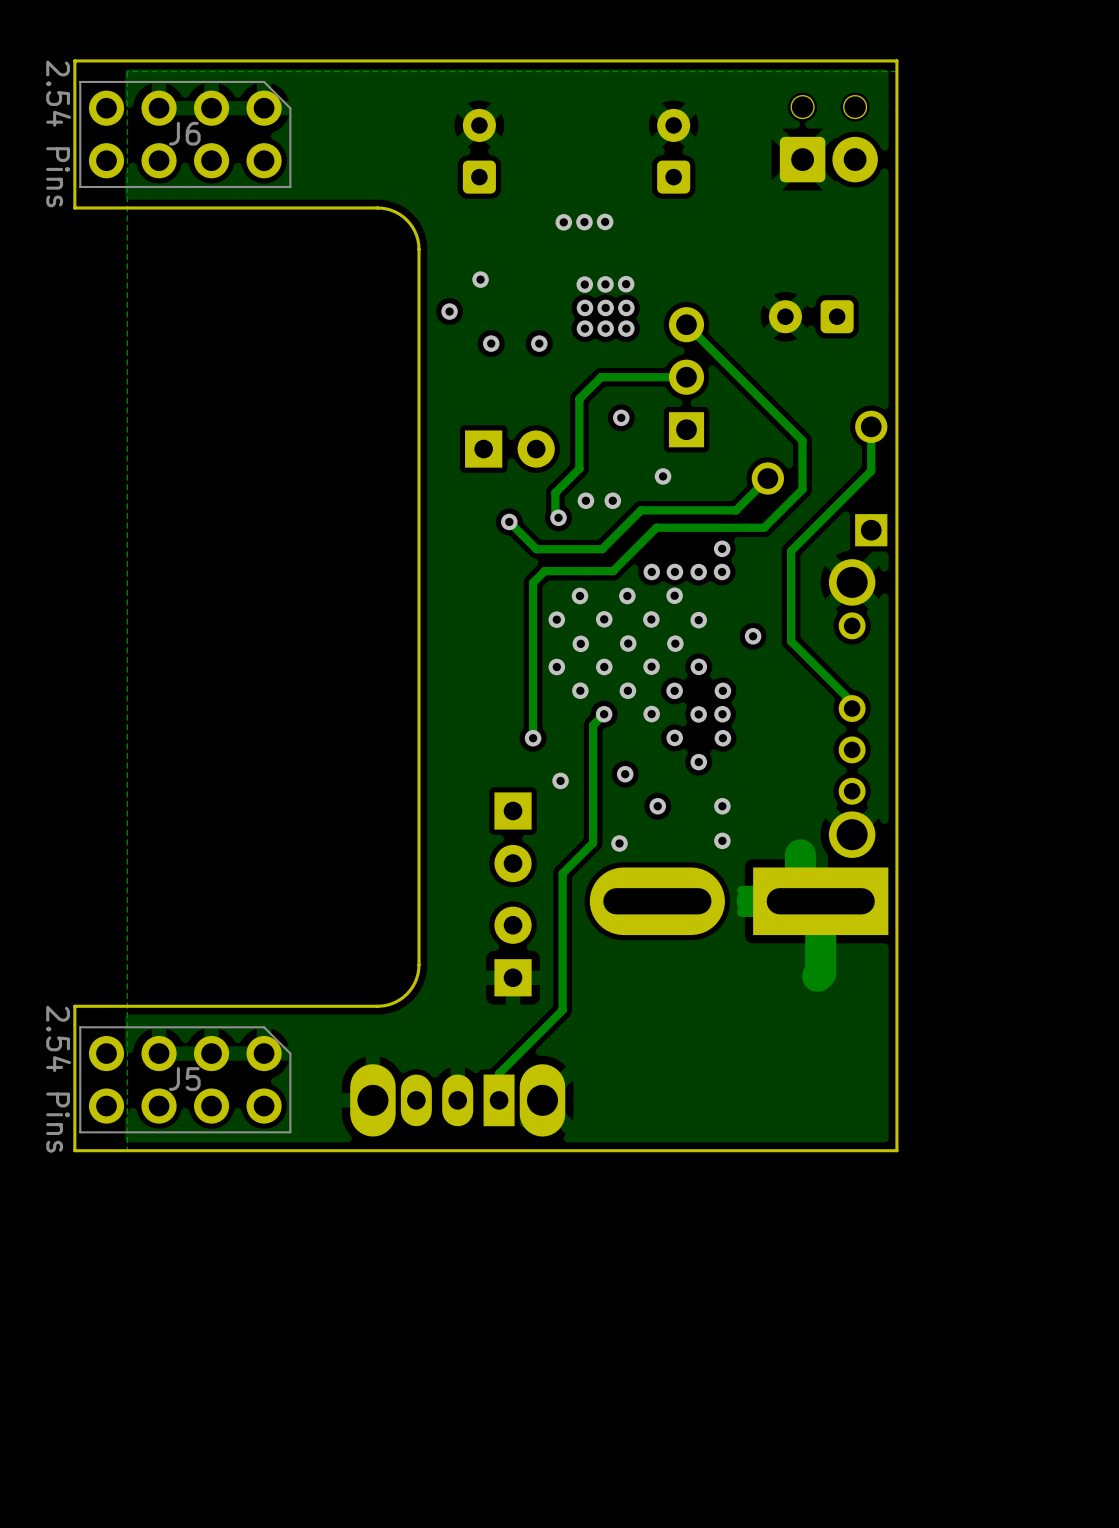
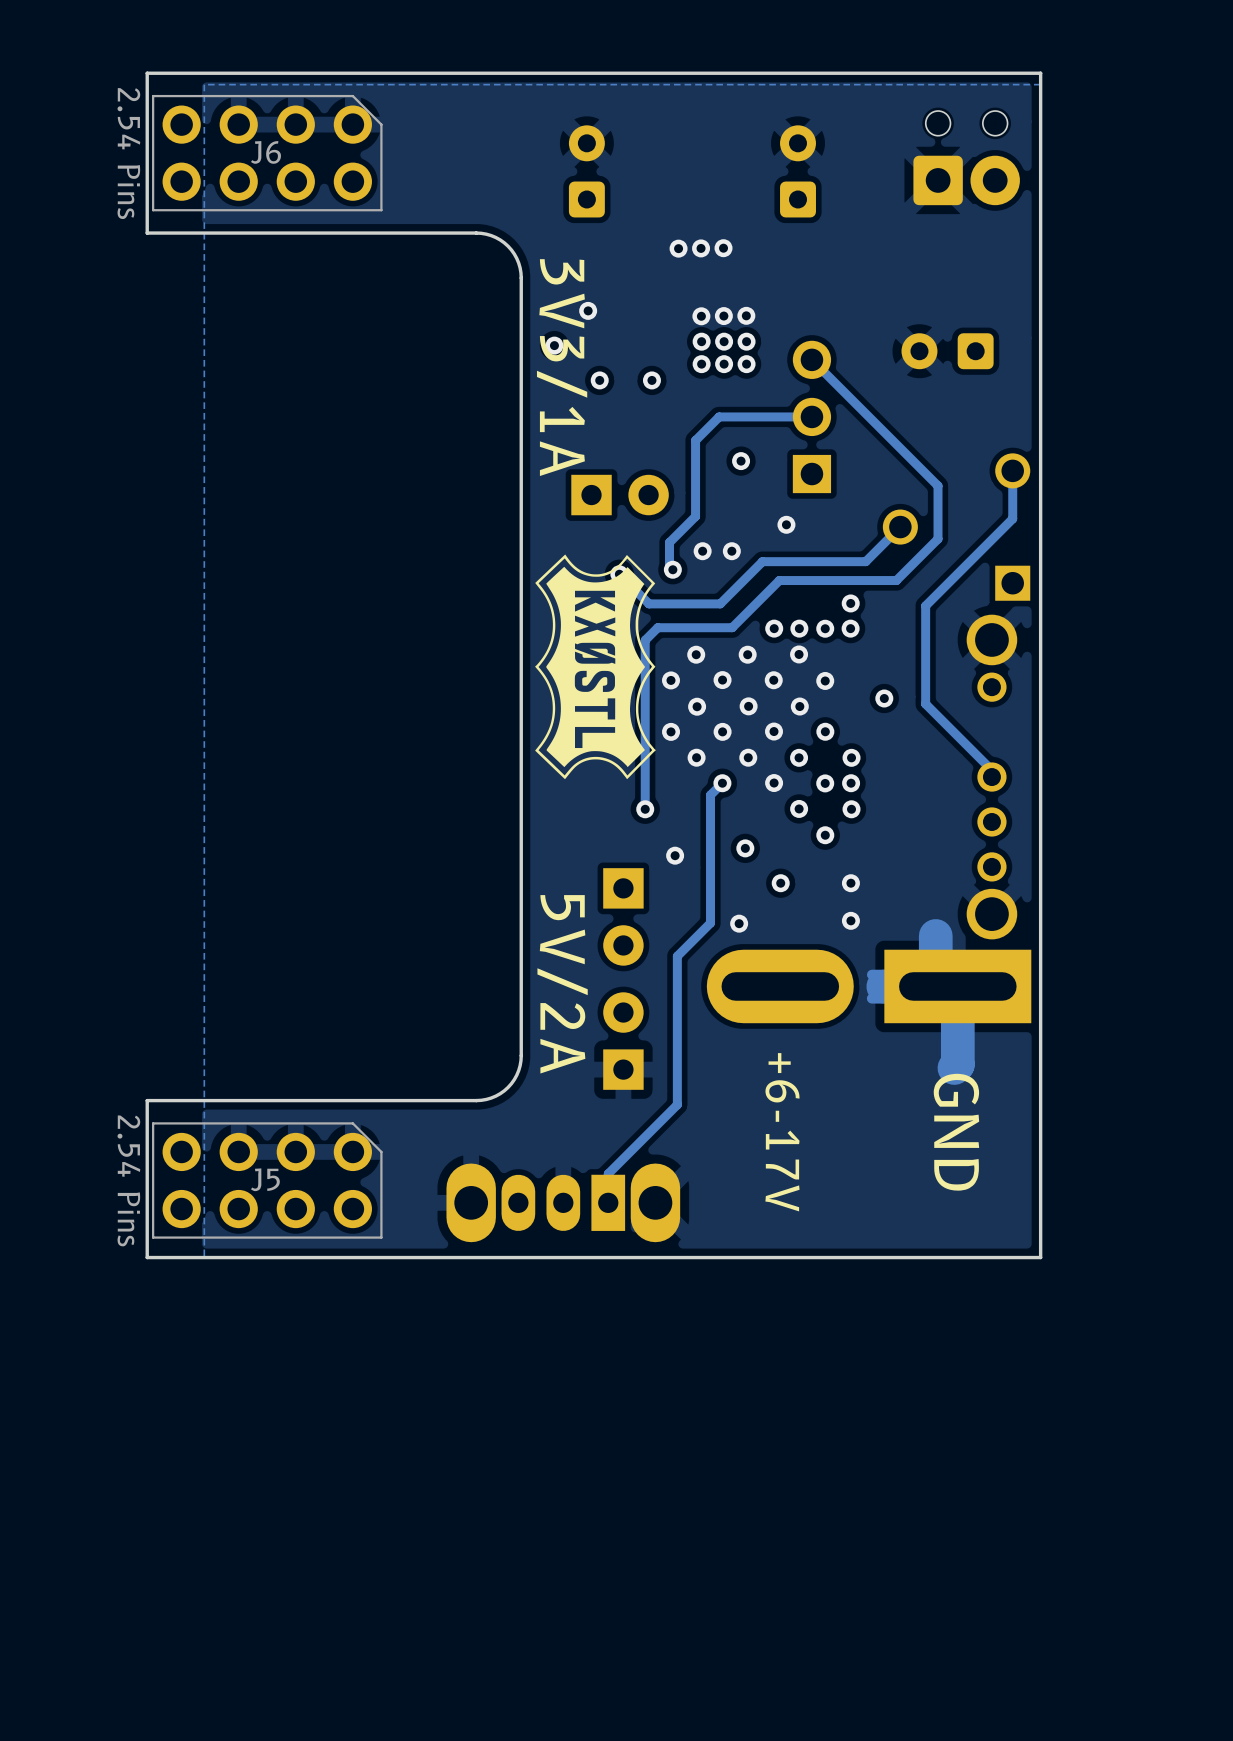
text: none -> 3V3/1A (562, 367)
drawing: none -> [535, 554, 656, 780]
text: none -> 5V/2A (562, 984)
text: none -> GND (956, 1132)
text: none -> +6-17V (782, 1132)

